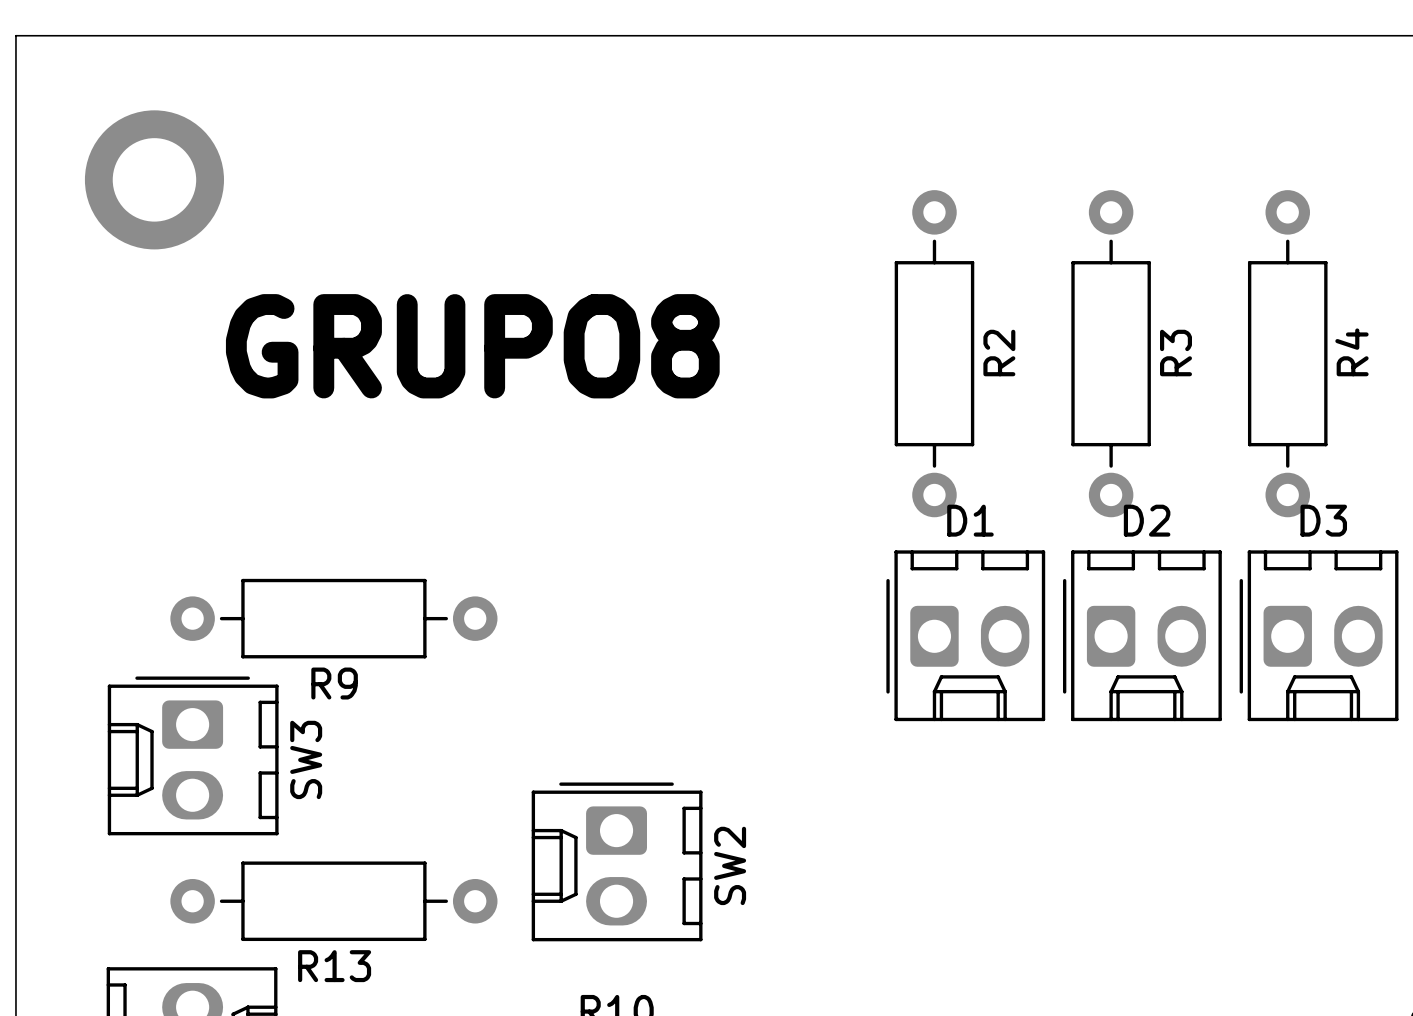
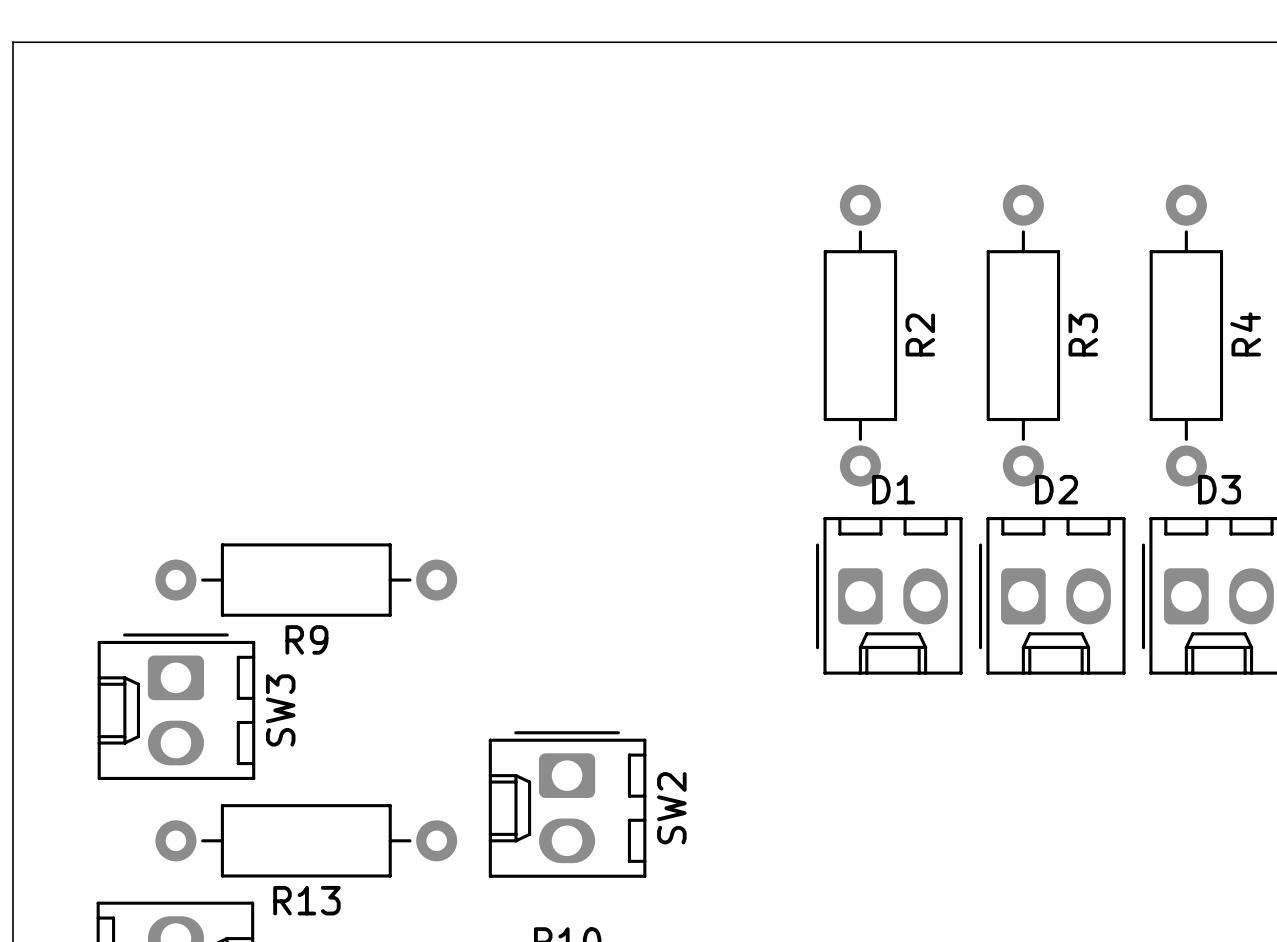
via: (154, 179) -> none
text: GRUPO8 (472, 346) -> none

